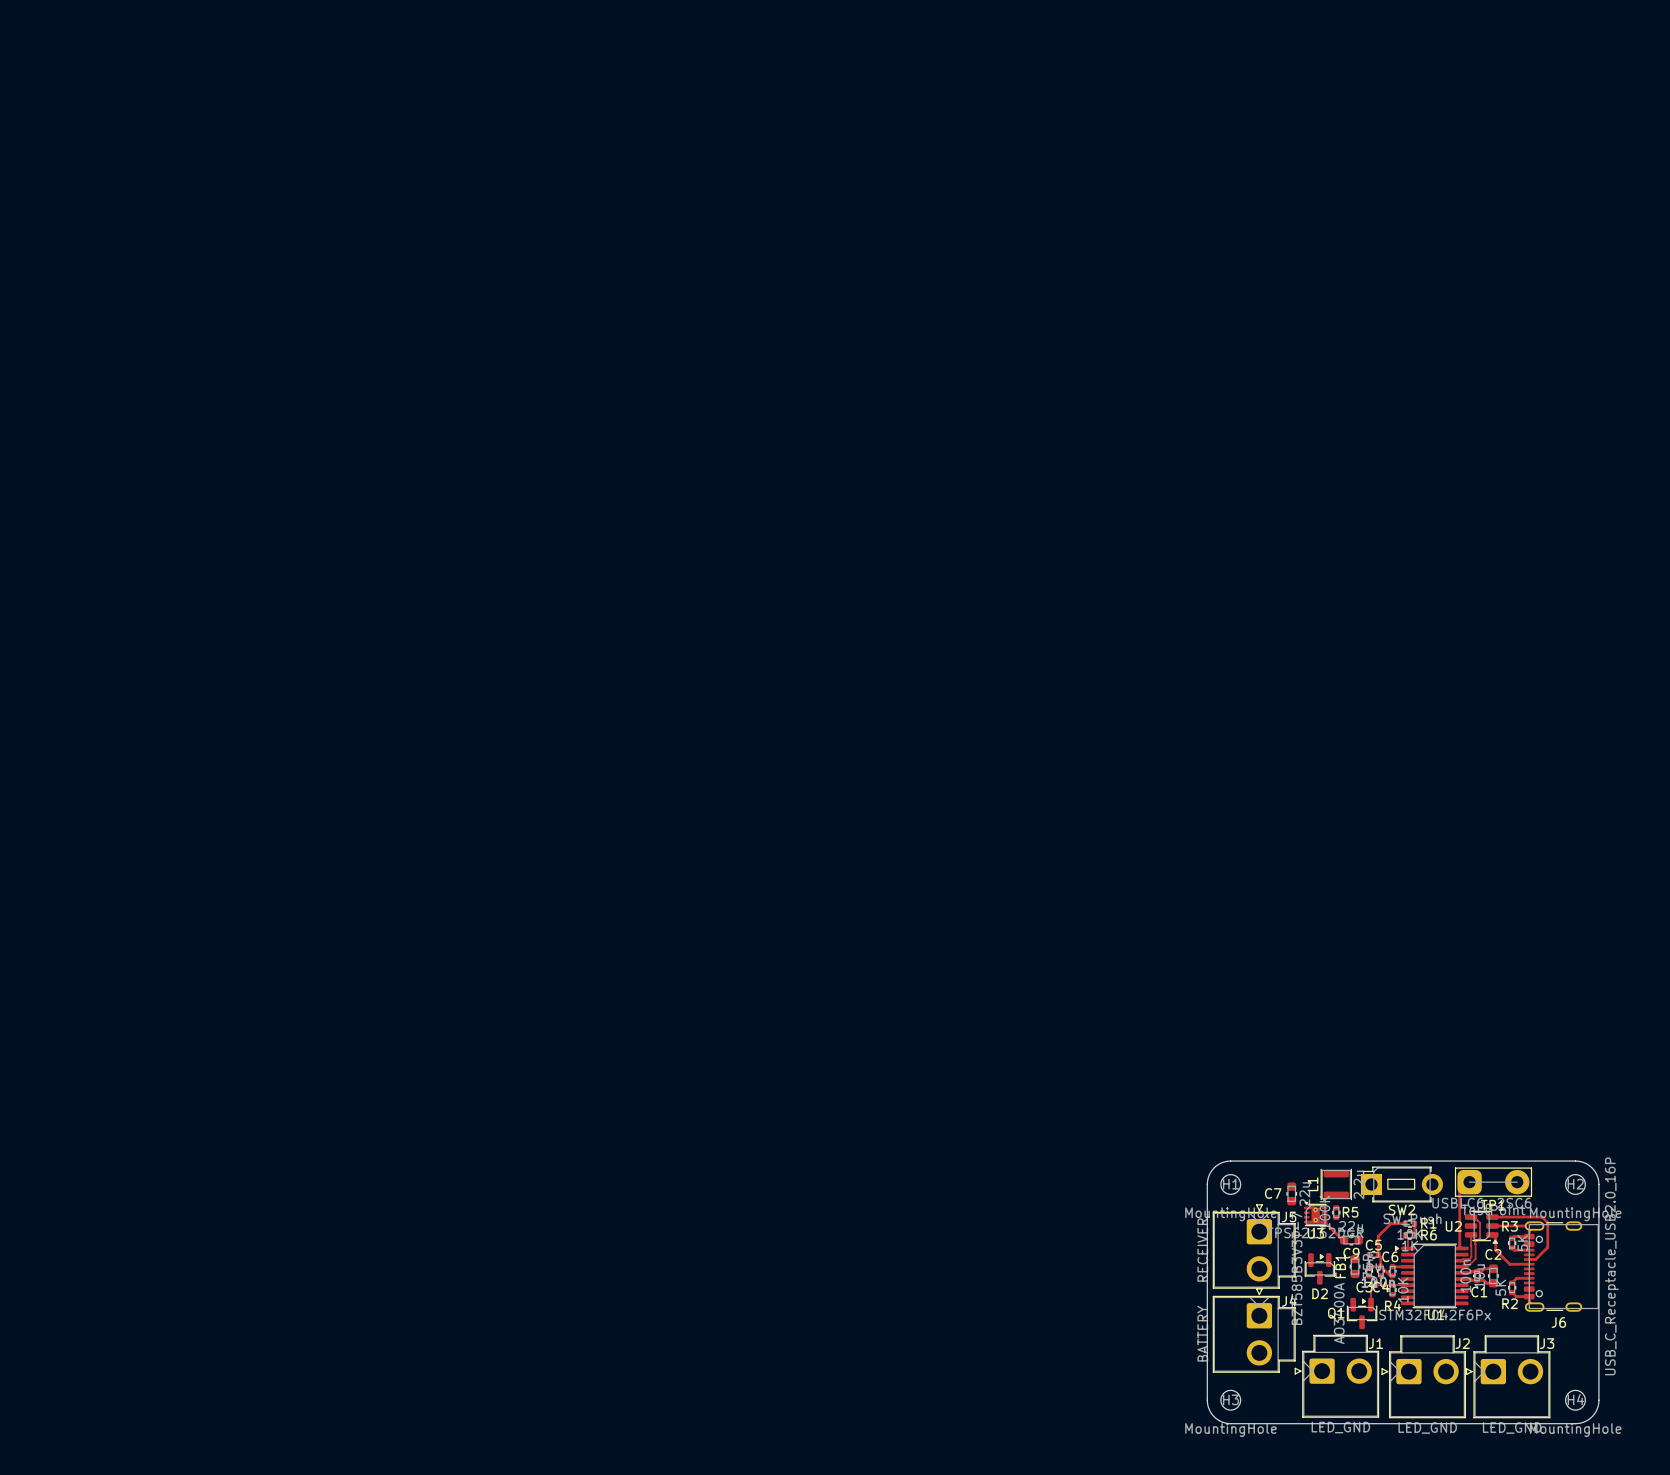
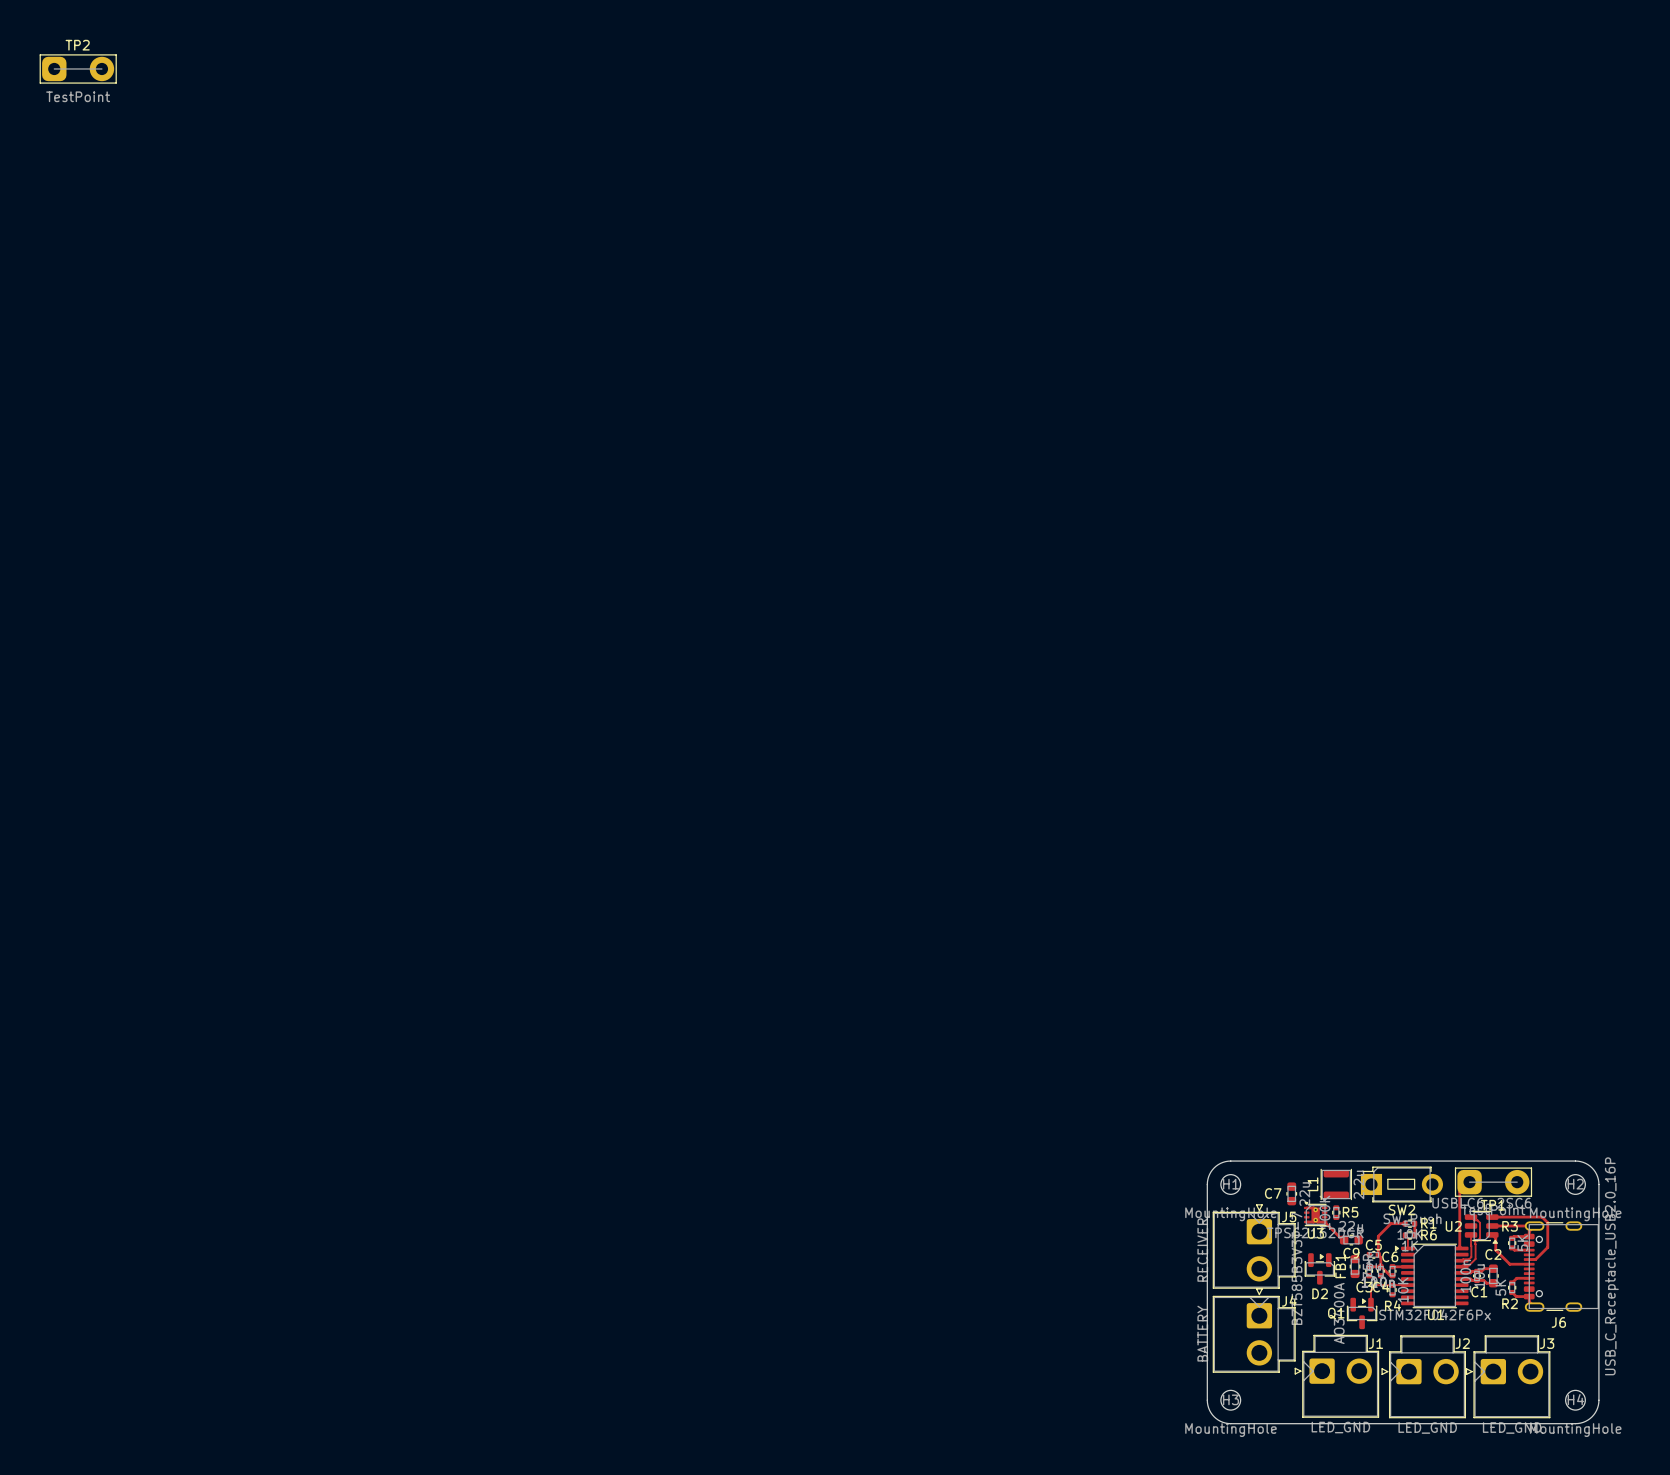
TP2: none -> TestPoint (78, 68)

